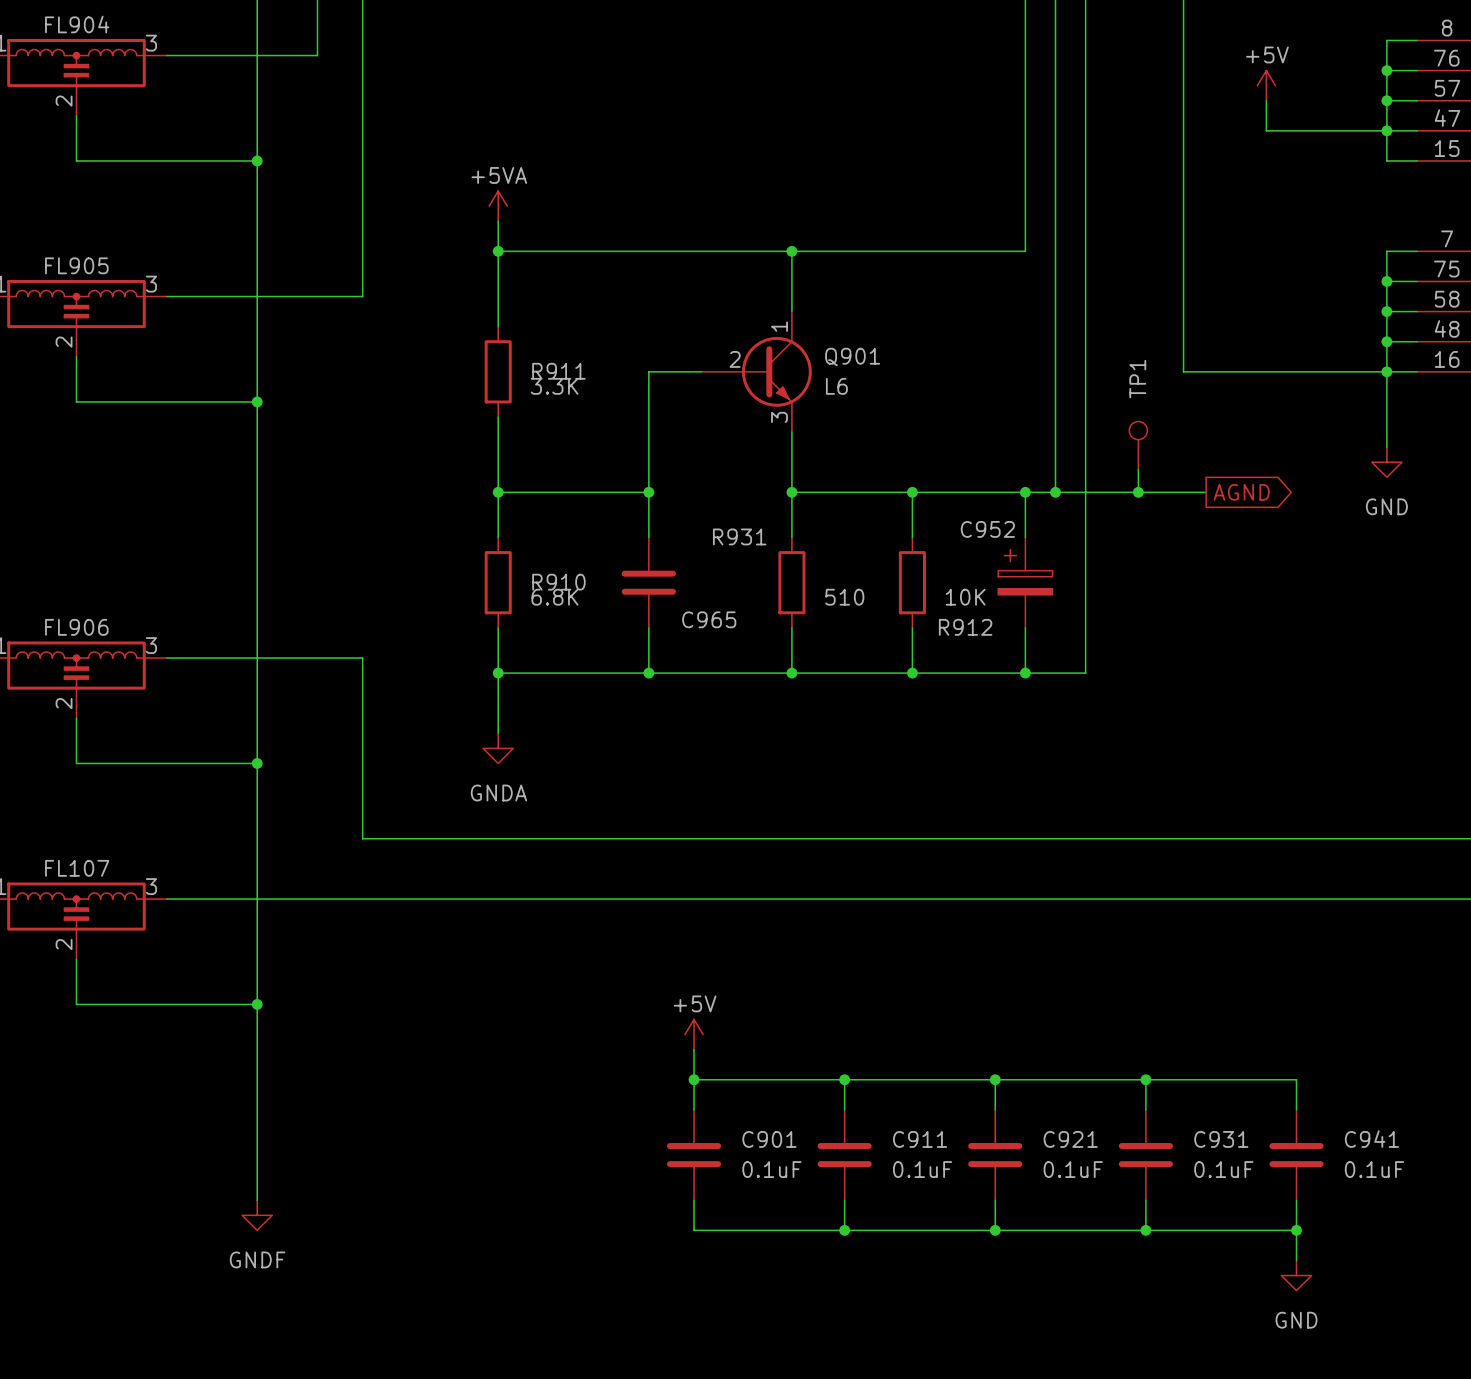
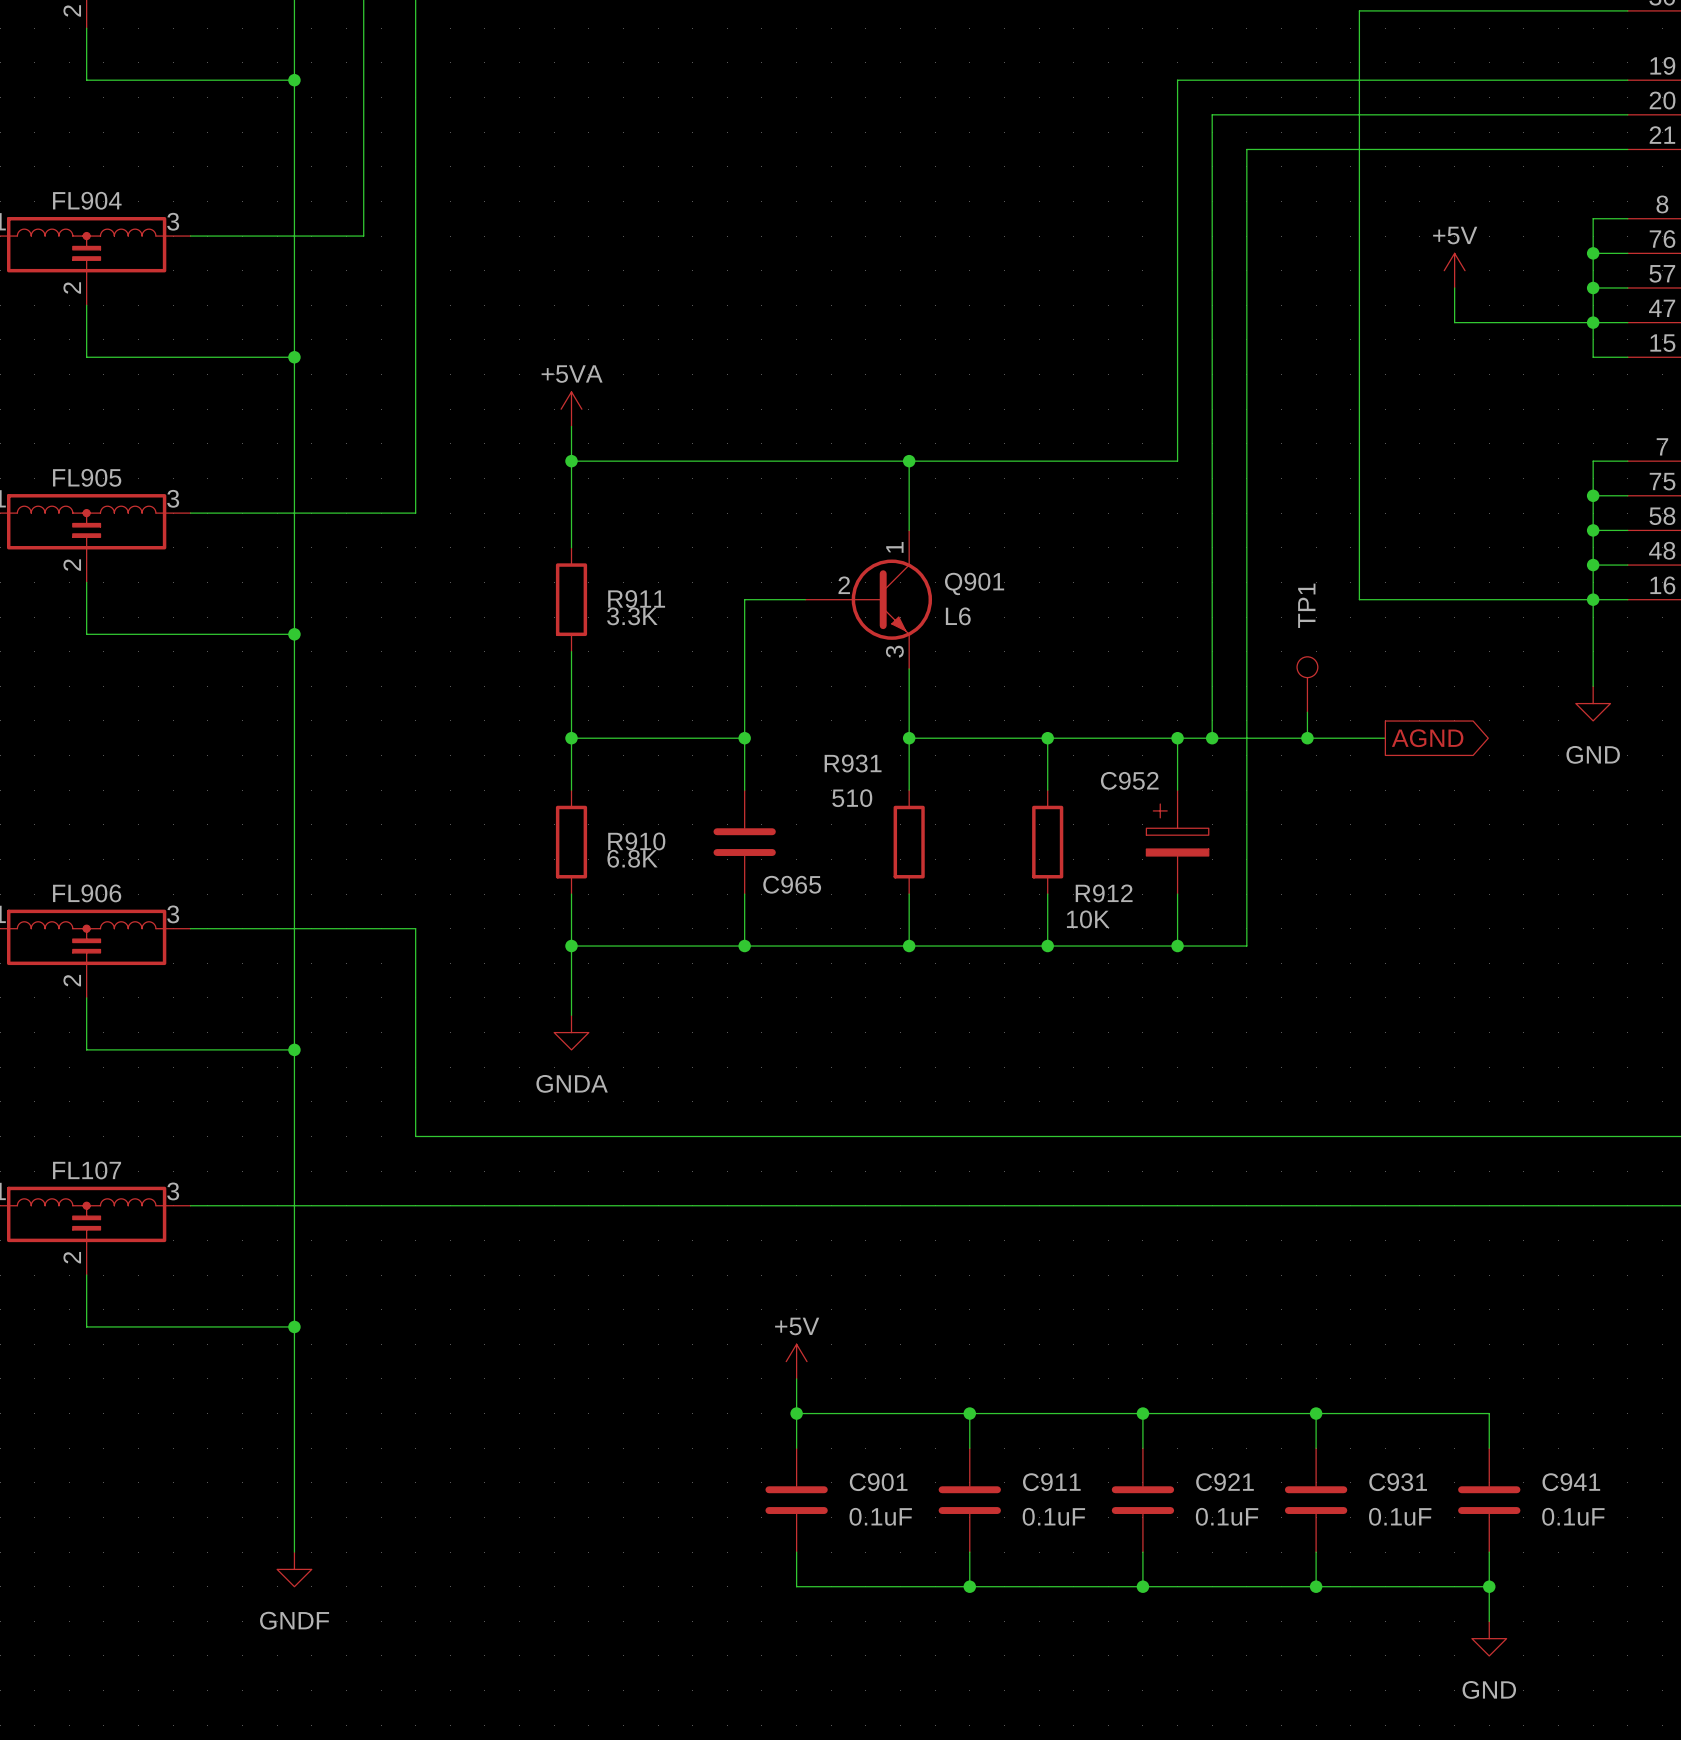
R931 name position: R931 (739, 536) -> R931 (853, 763)
R931 value position: 510 (844, 597) -> 510 (852, 798)
R912 value position: 10K (965, 597) -> 10K (1088, 919)
C965 name position: C965 (709, 619) -> C965 (792, 884)

